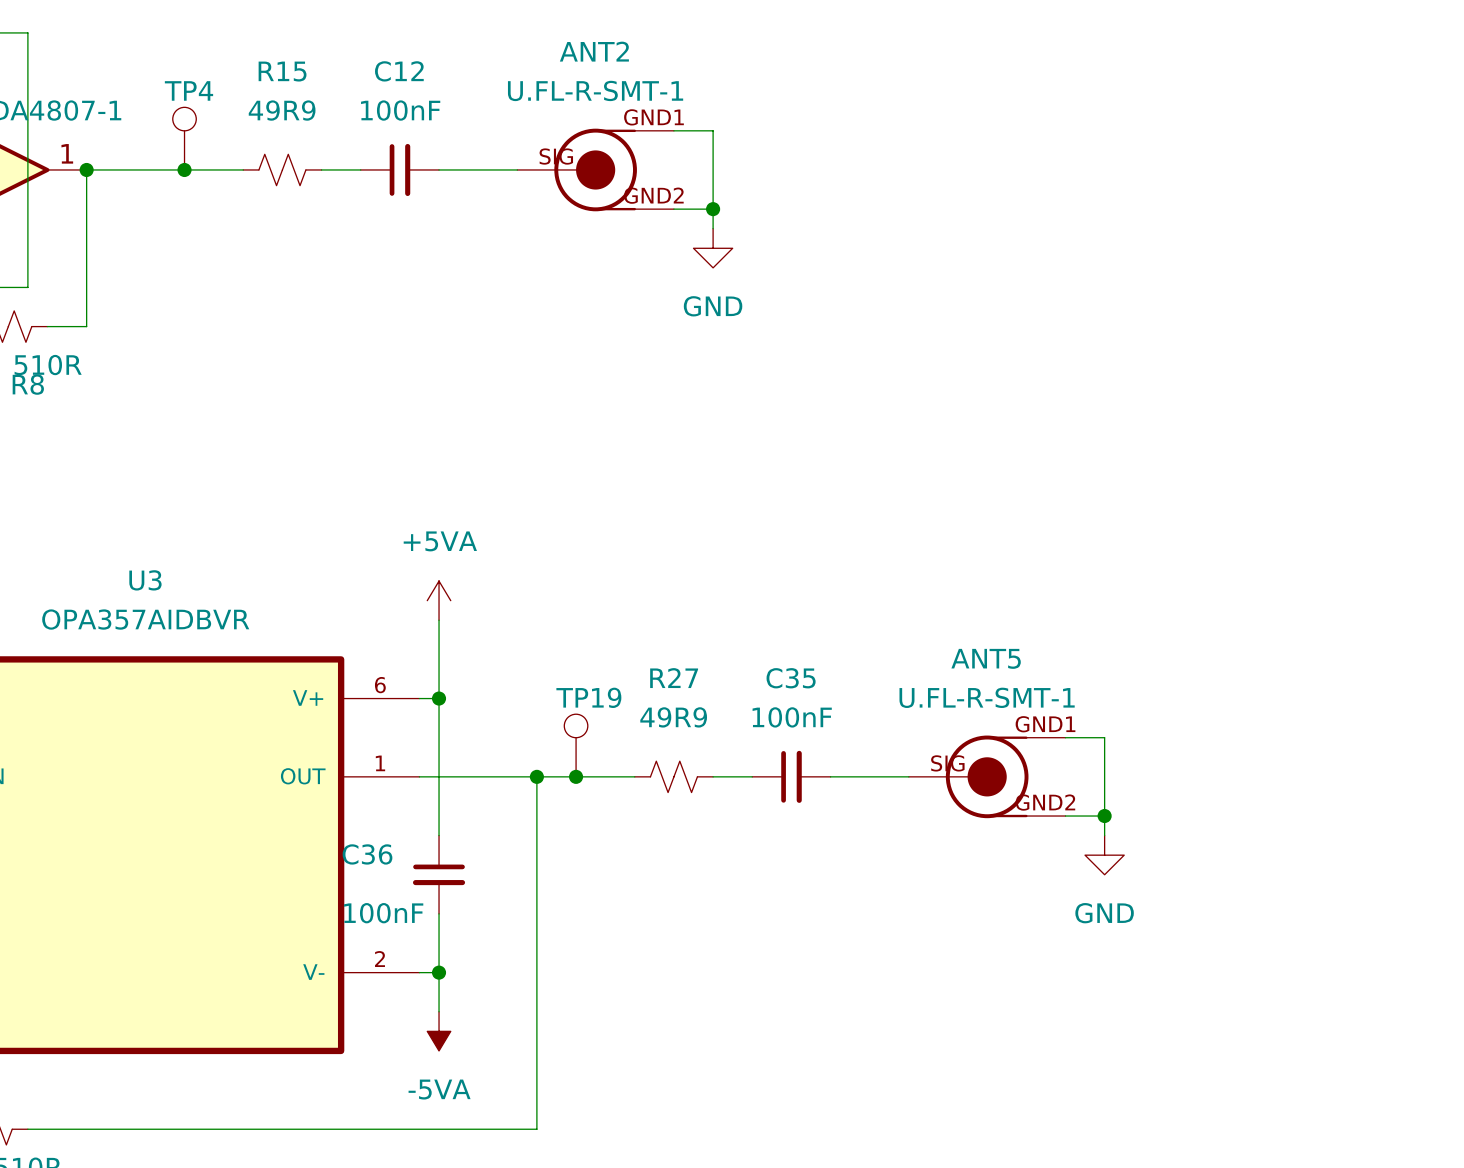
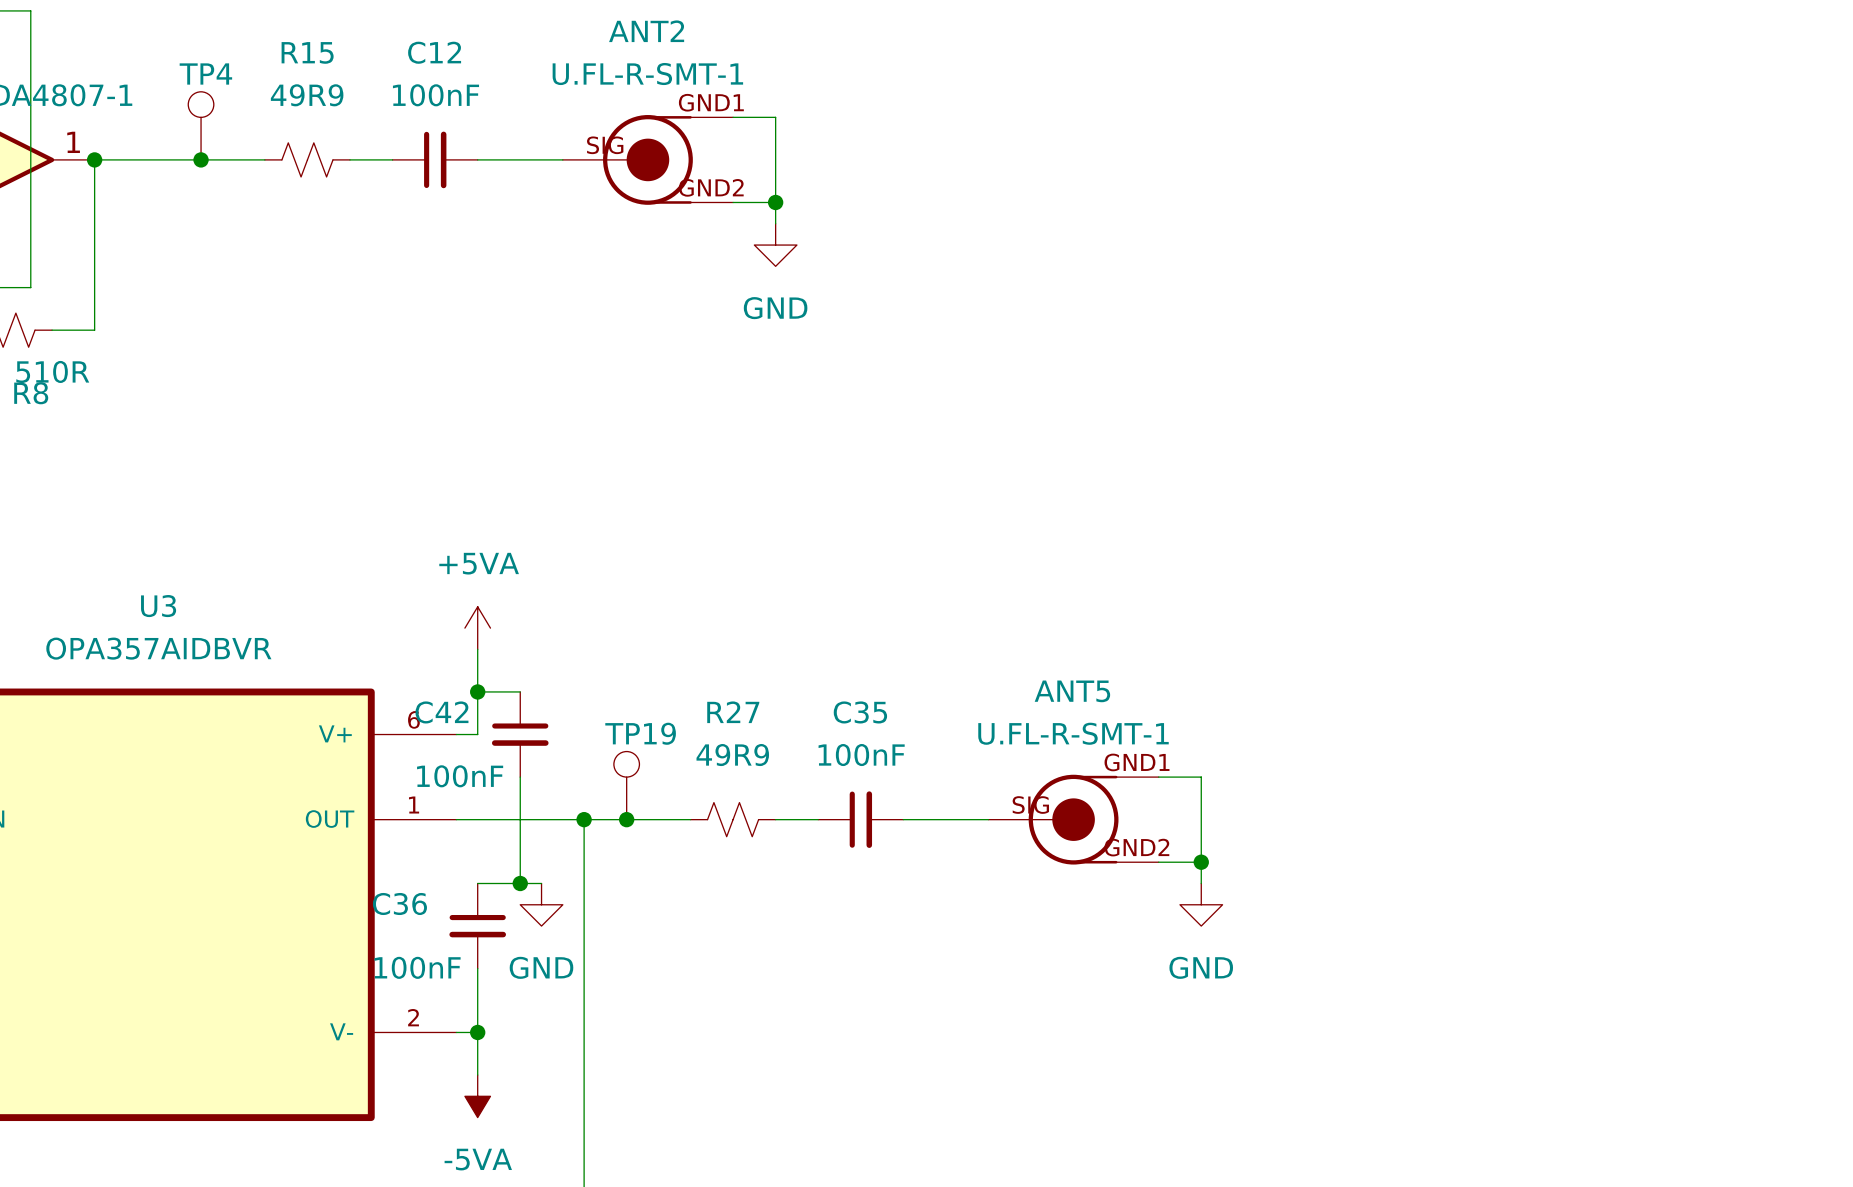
wire: none -> (477, 691) (520, 691)
wire: (439, 698) (439, 835) -> (541, 883) (477, 883)
junction position: (439, 698) -> (477, 691)
C42: none -> 100nF (520, 734)
wire: none -> (520, 777) (520, 883)
junction: none -> (520, 883)
power symbol: none -> GND (541, 904)

